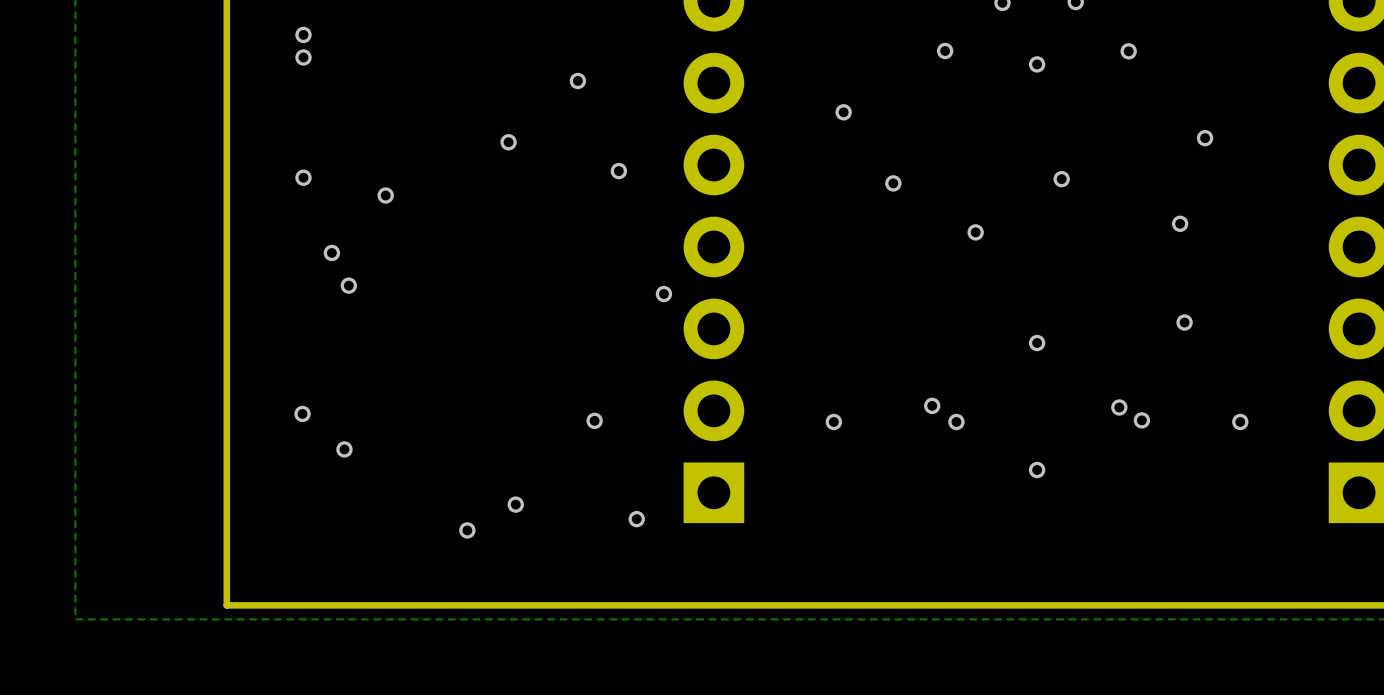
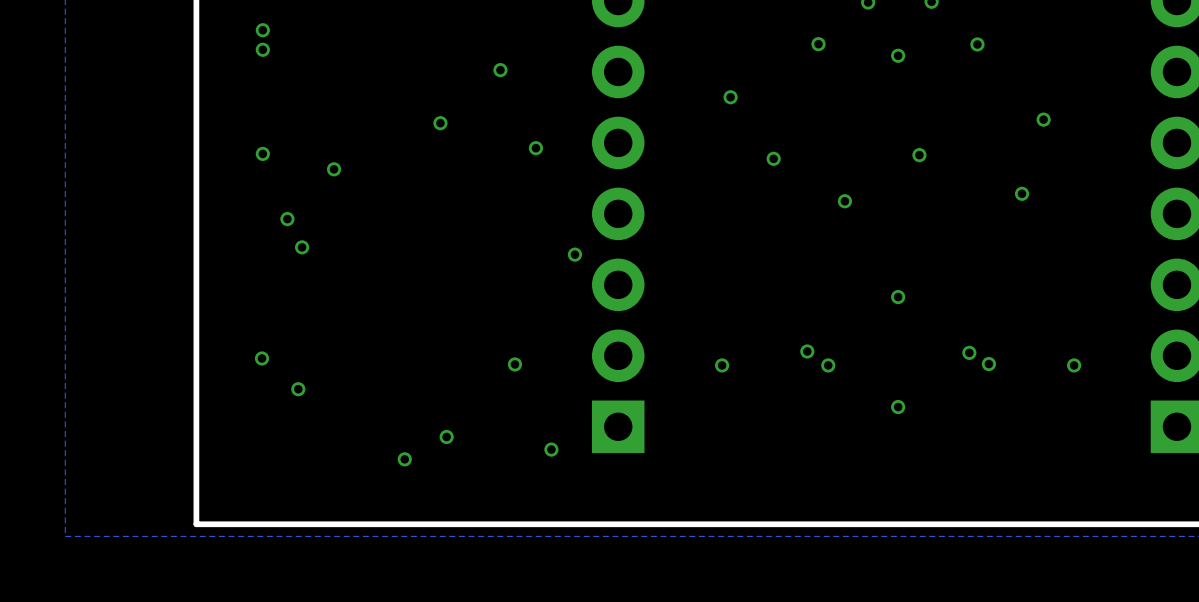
via: (1184, 322) -> none

